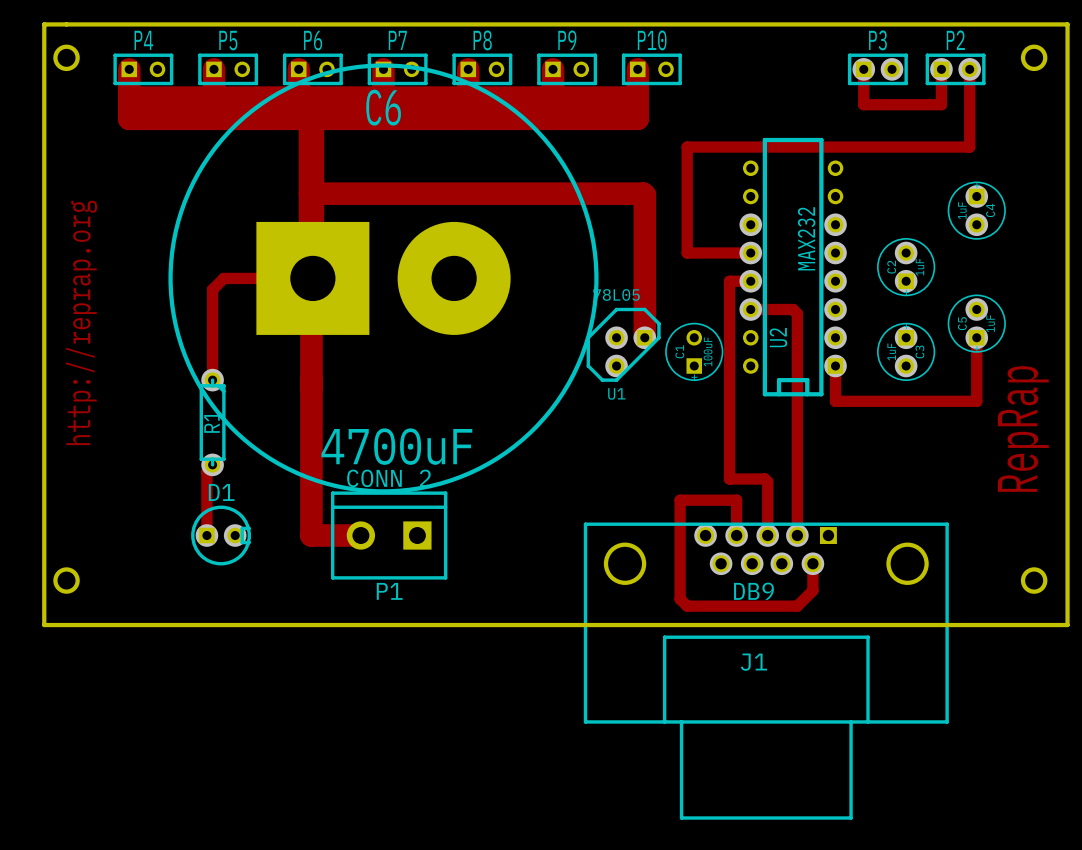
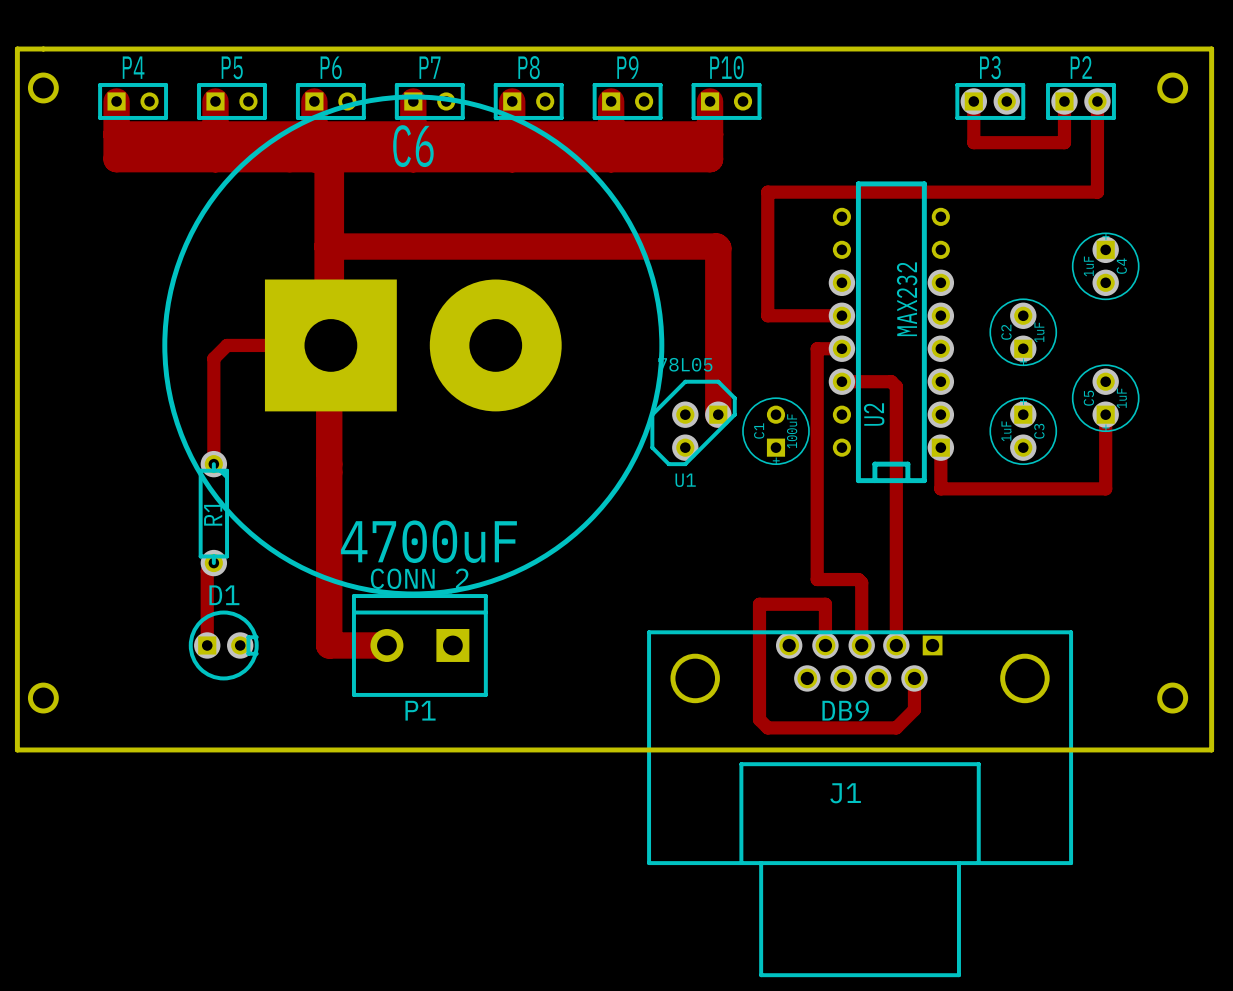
text: http://reprap.org (81, 322) -> none
text: RepRap (1023, 429) -> none

